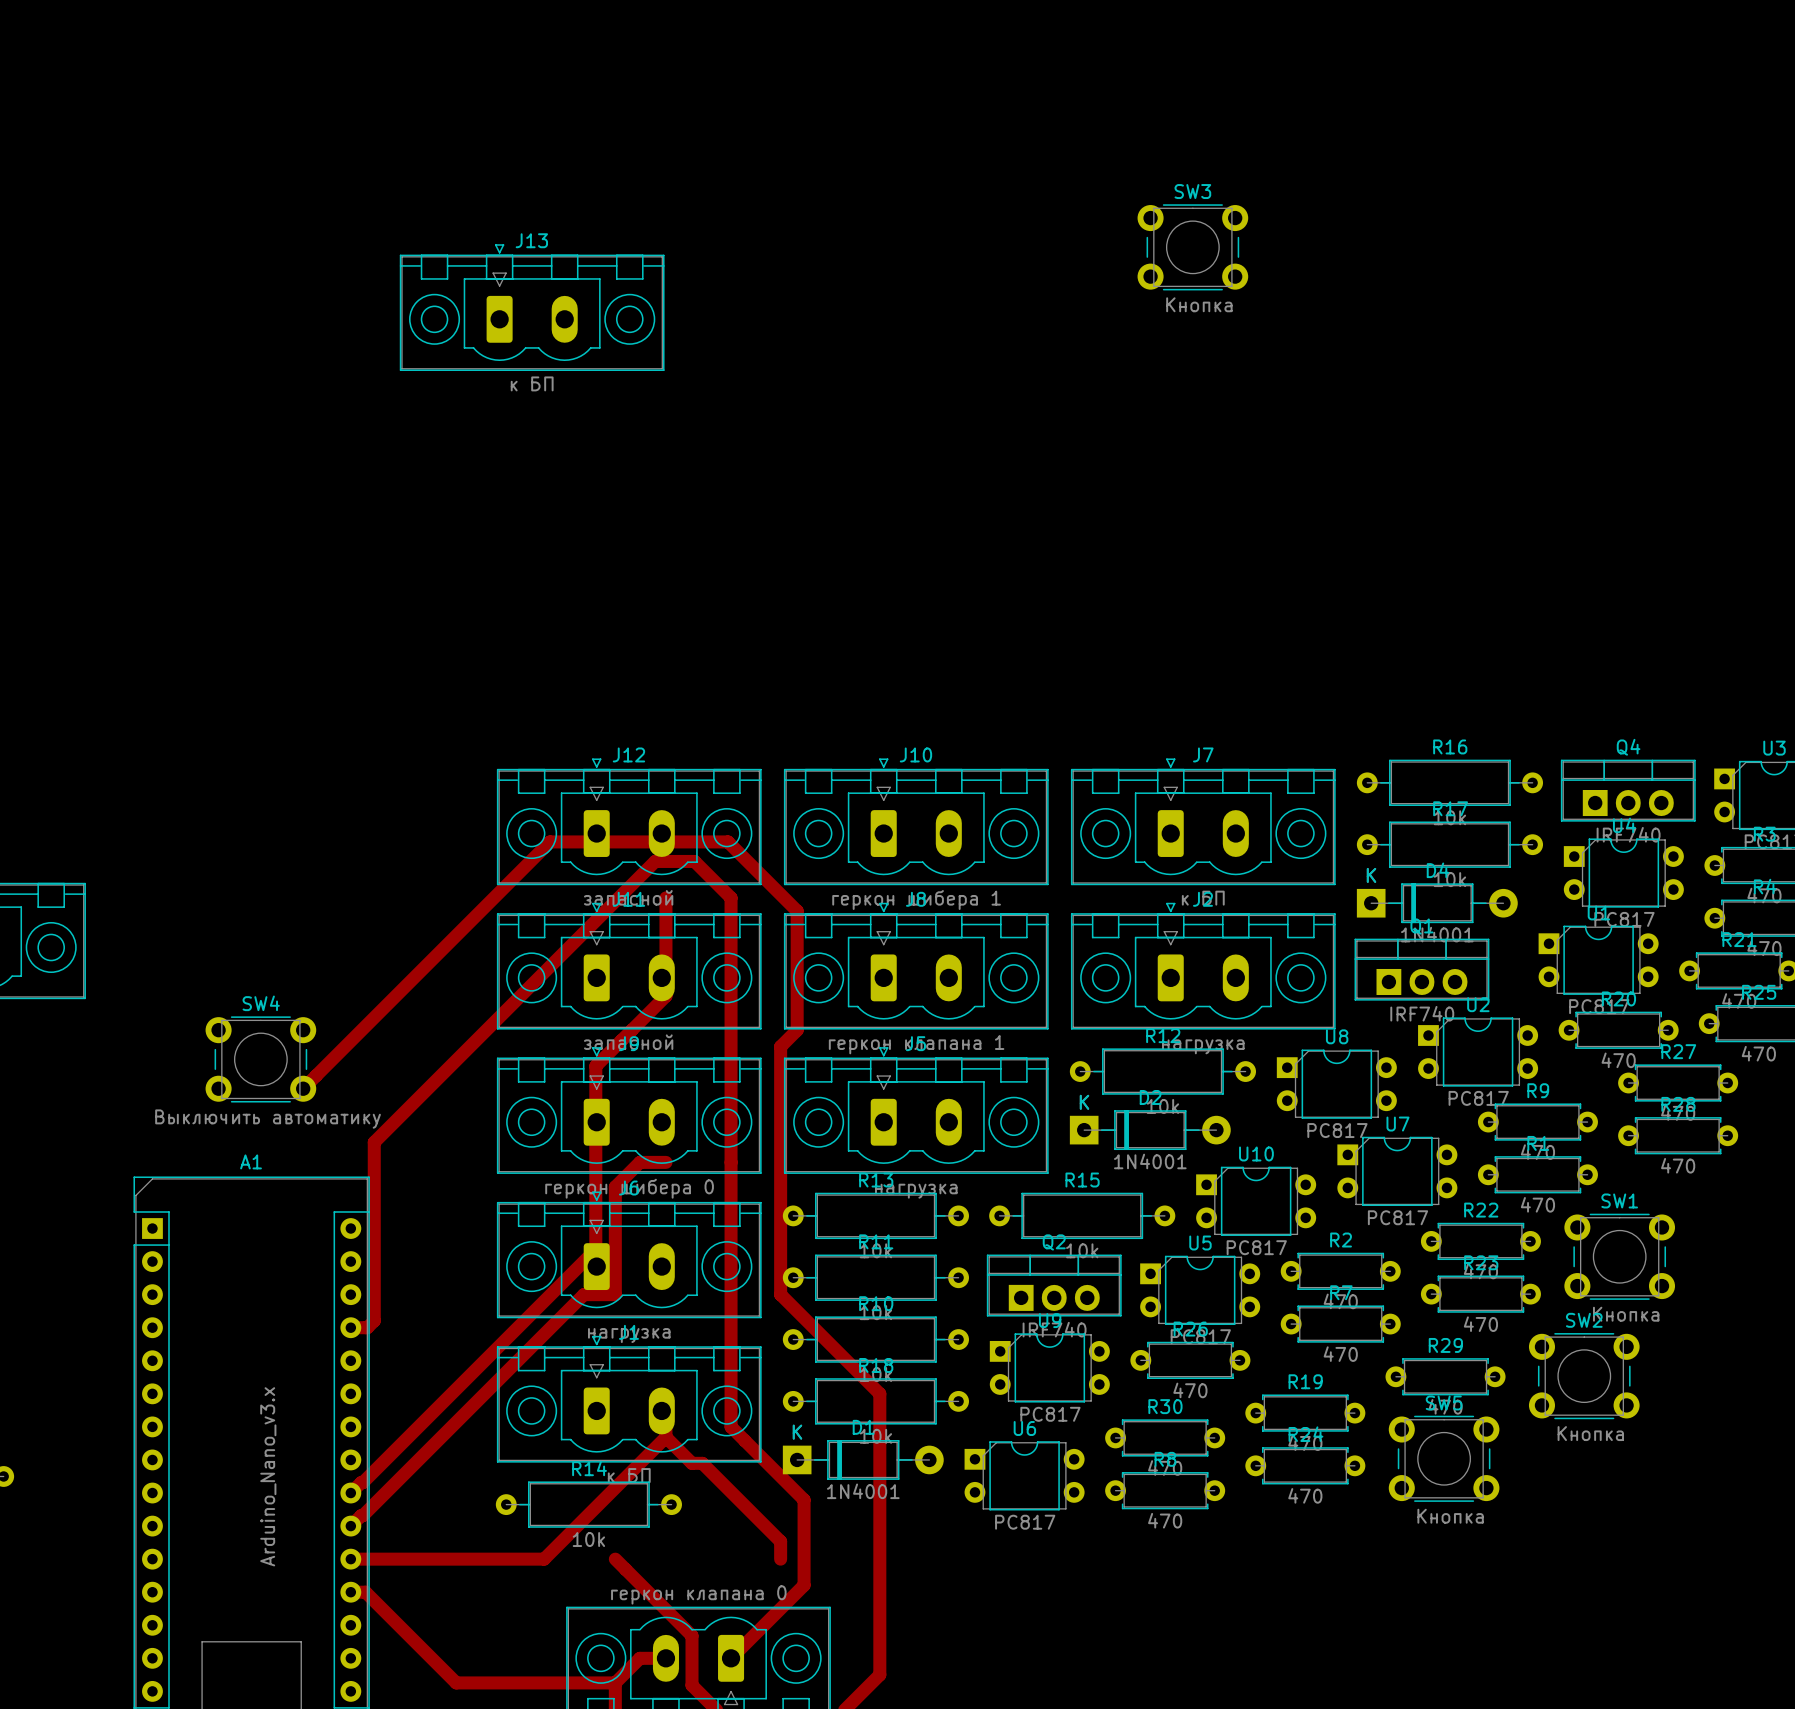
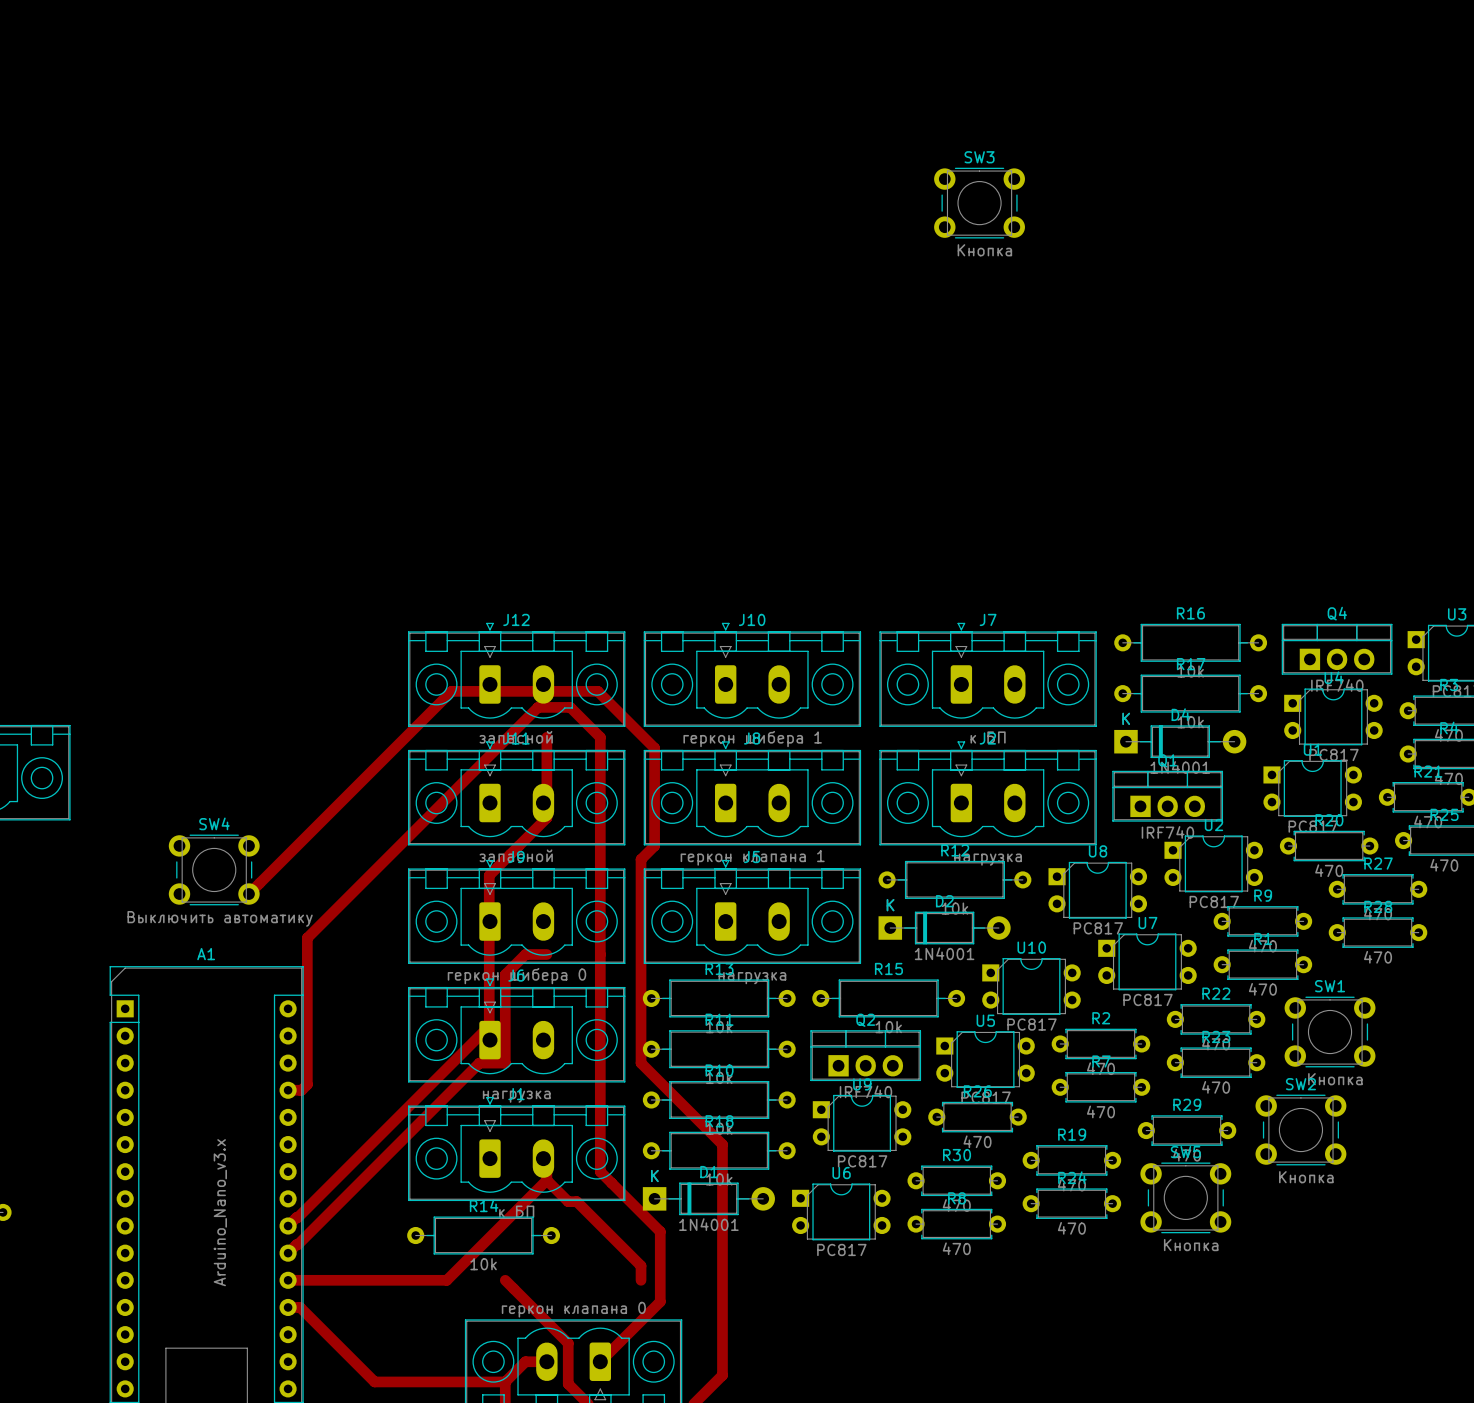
J13: к БП (532, 307) -> none

